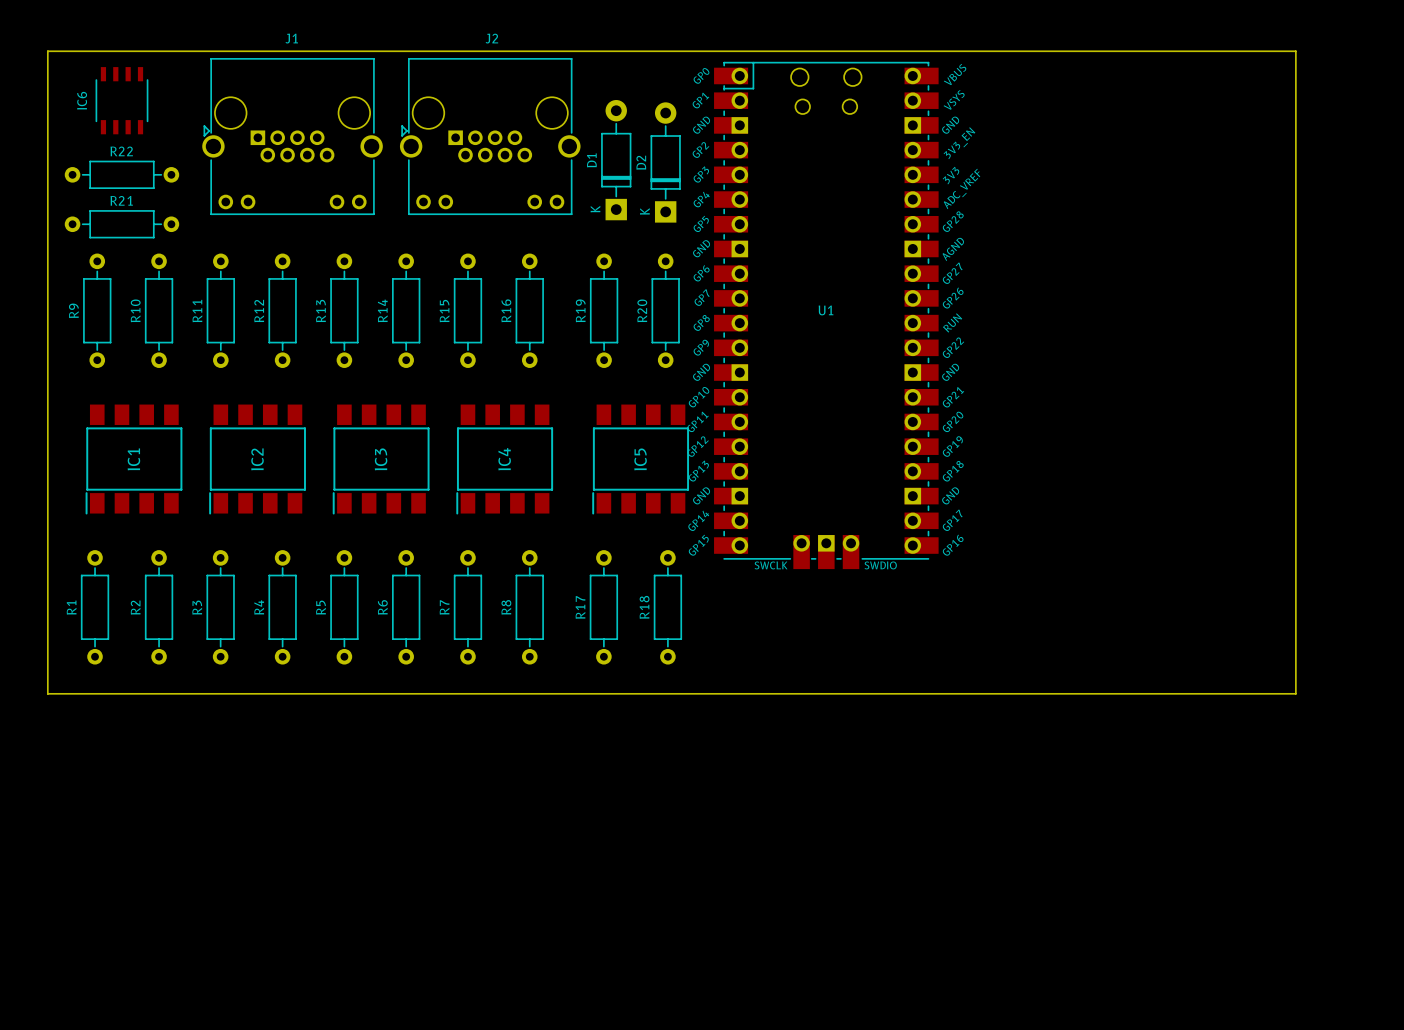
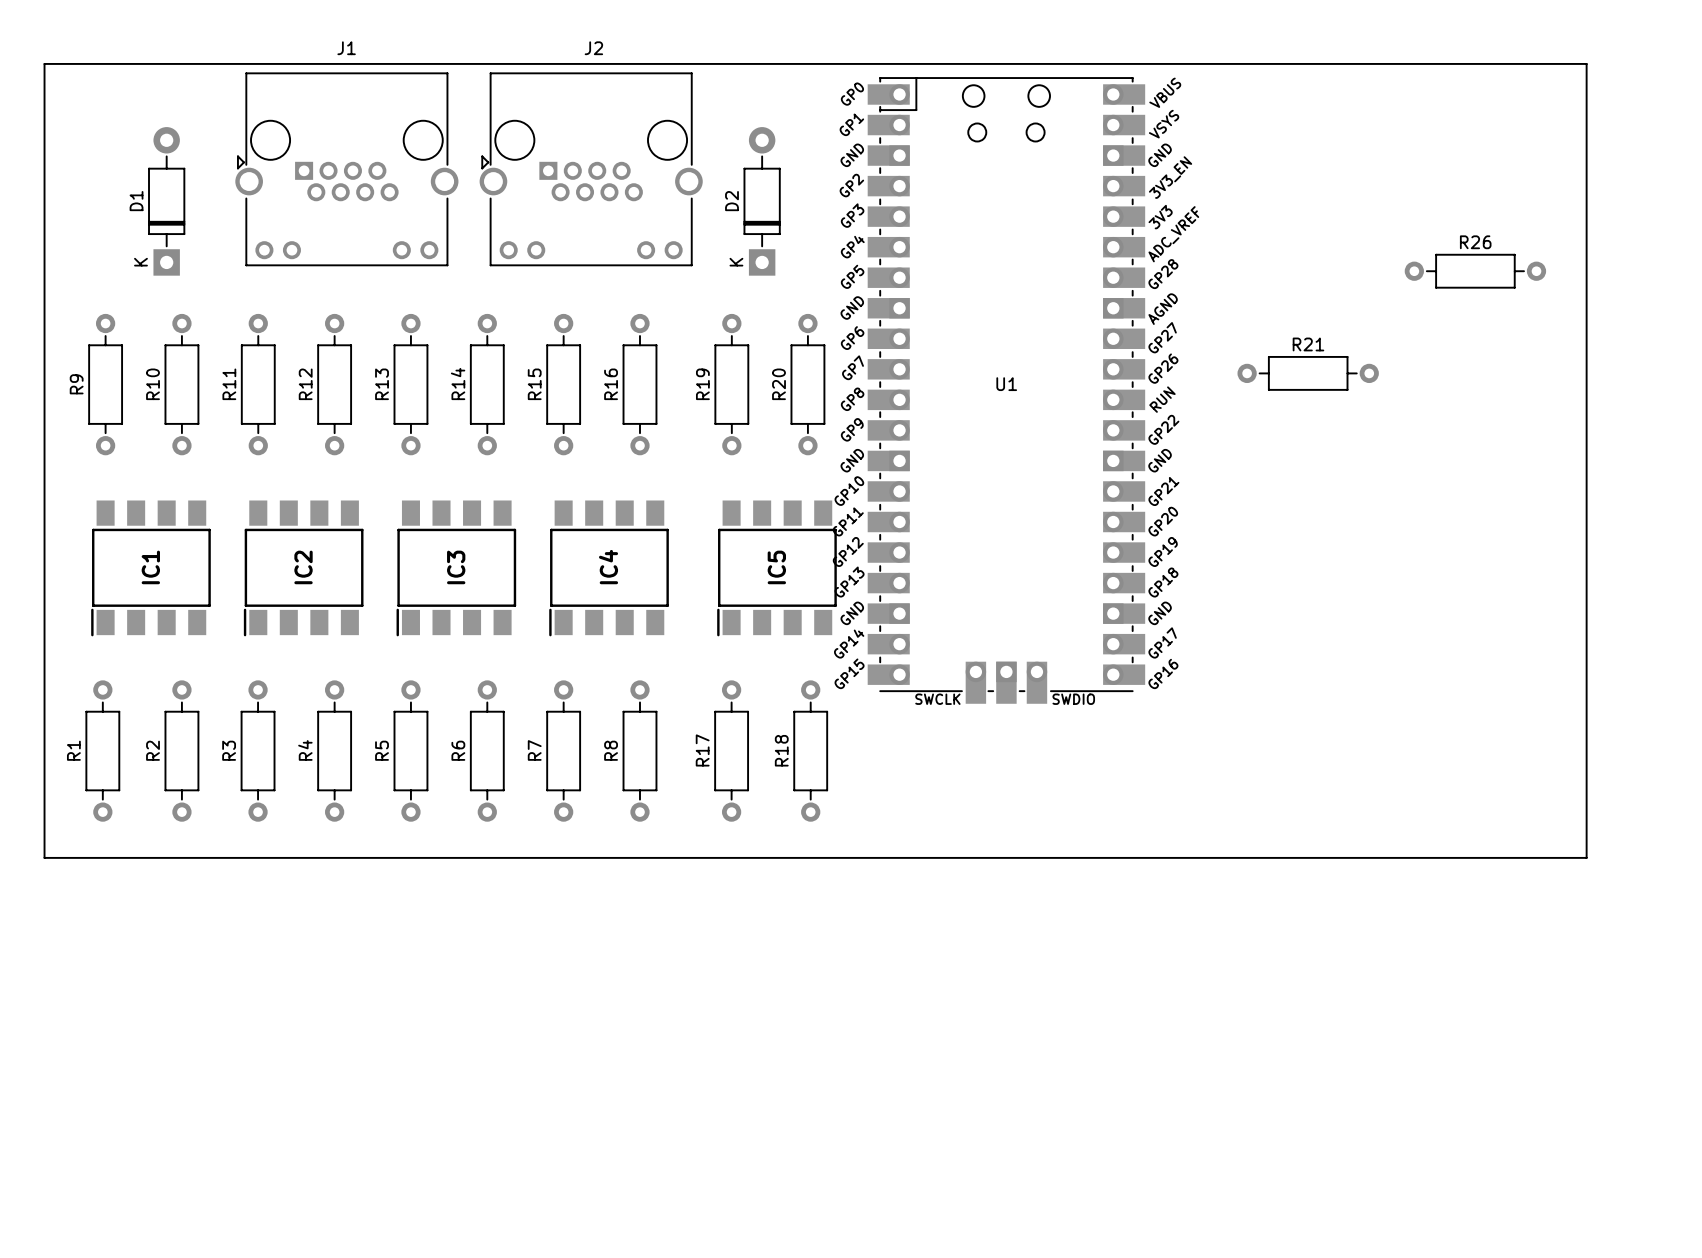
IC6: (121, 100) -> none
D1 position: (616, 160) -> (166, 201)
D2 position: (665, 162) -> (762, 201)
R22: (121, 174) -> none
R26: none -> (1475, 271)
R21 position: (121, 224) -> (1308, 373)

